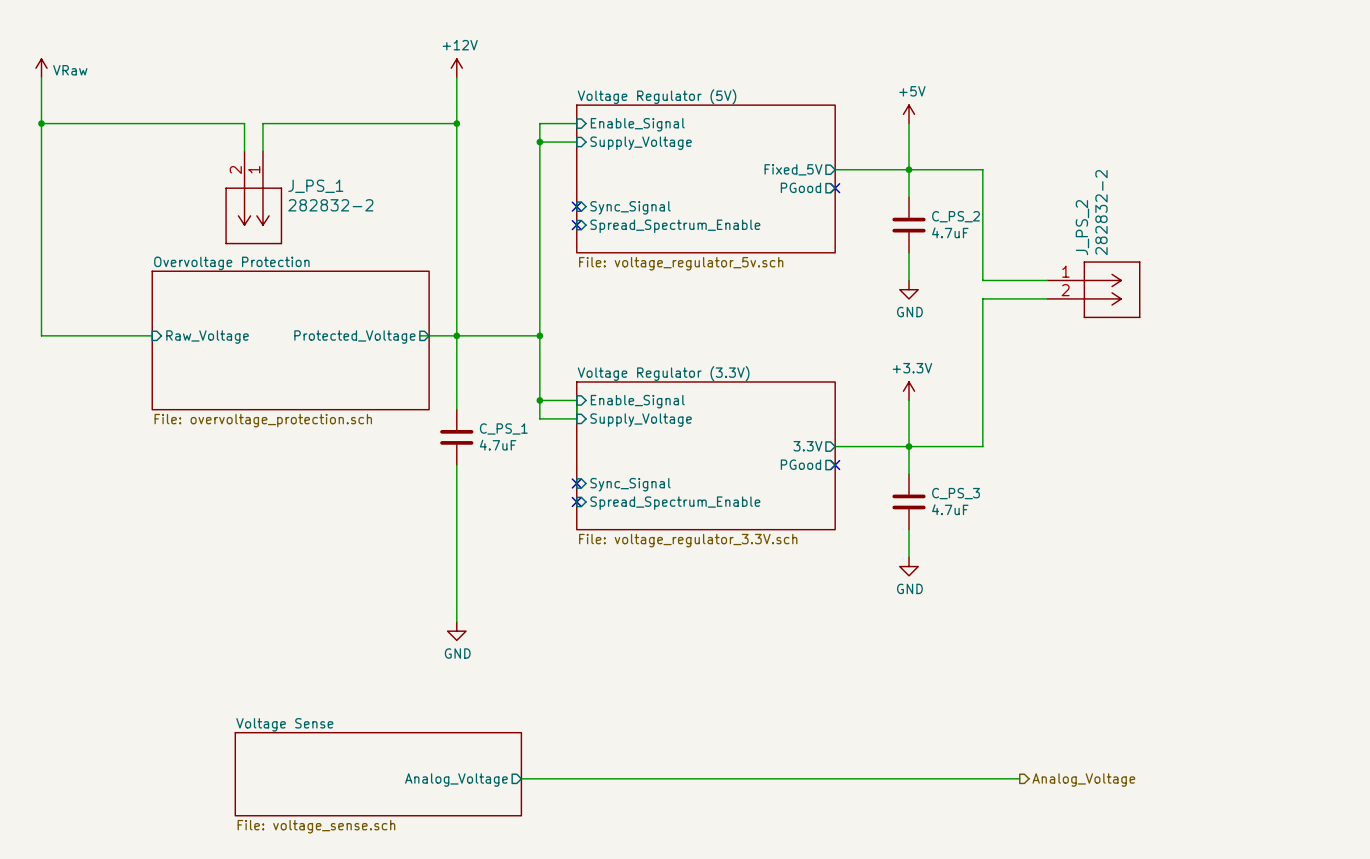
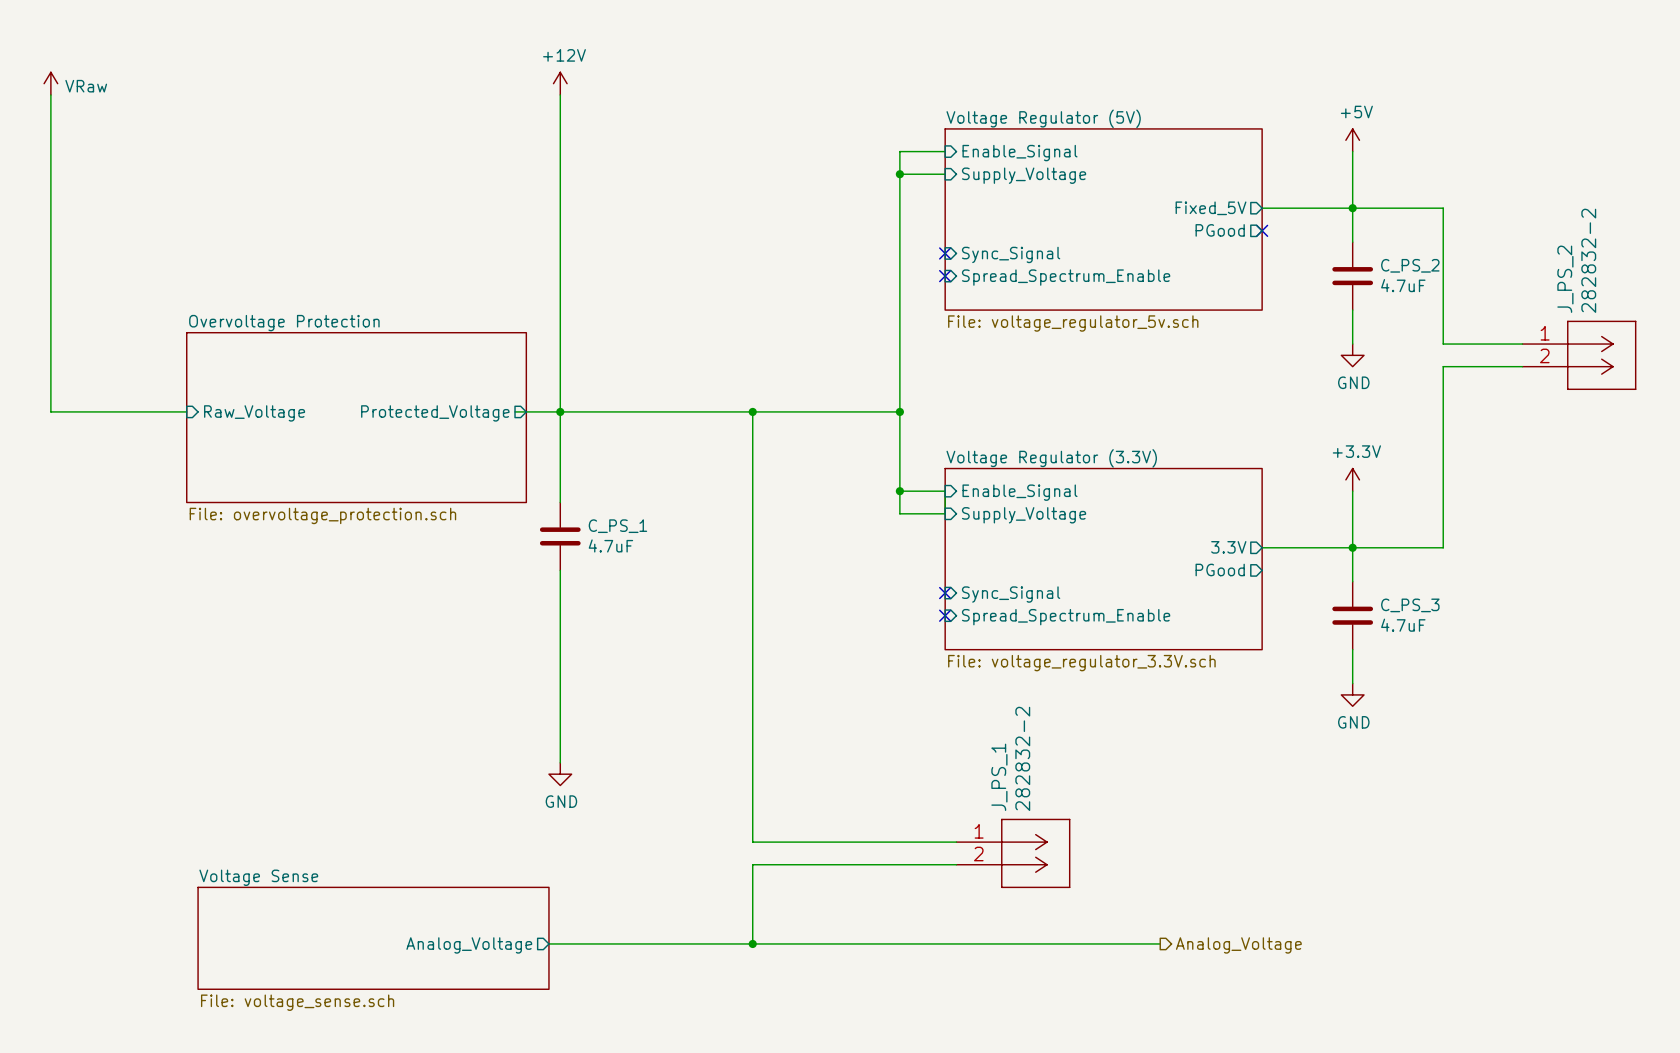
power symbol: +5V (909, 114) -> none
power symbol: none -> +5V (1352, 140)
wire: (41, 123) (244, 123) (244, 151) -> none
junction: (41, 123) -> none
wire: (456, 123) (262, 123) (262, 151) -> none
junction: (456, 123) -> none
wire: (576, 123) (539, 123) (539, 418) (576, 418) (576, 400) (539, 400) -> none
wire: none -> (945, 151) (899, 151) (899, 513) (945, 513) (945, 491) (899, 491)
wire: (909, 123) (909, 197) -> none
wire: none -> (1352, 151) (1352, 242)
sheet pin: Enable_Signal (637, 124) -> none
sheet pin: none -> Enable_Signal (1020, 153)
wire: (539, 142) (576, 142) -> none
junction: (539, 142) -> none
wire: none -> (899, 174) (945, 174)
junction: none -> (899, 174)
sheet pin: Supply_Voltage (641, 143) -> none
sheet pin: none -> Supply_Voltage (1024, 175)
sheet pin: Fixed_5V (793, 169) -> none
wire: (835, 169) (982, 169) (982, 280) (1047, 280) -> none
junction: (909, 169) -> none
sheet pin: none -> Fixed_5V (1211, 208)
wire: none -> (1262, 208) (1443, 208) (1443, 344) (1522, 344)
junction: none -> (1352, 208)
sheet Voltage Regulator (5V) position: (705, 178) -> (1103, 219)
sheet pin: PGood (800, 187) -> none
sheet pin: none -> PGood (1220, 230)
no-connect mark: (835, 188) -> none
no-connect mark: none -> (1262, 230)
J_PS_1 position: (253, 197) -> (1013, 853)
no-connect mark: (576, 206) -> none
no-connect mark: none -> (945, 253)
sheet pin: Sync_Signal (630, 207) -> none
sheet pin: none -> Sync_Signal (1011, 254)
J_PS_1 rotation: 0° (253, 215) -> 90° counterclockwise (1035, 853)
no-connect mark: (576, 225) -> none
no-connect mark: none -> (945, 276)
C_PS_2 position: (909, 225) -> (1352, 276)
sheet pin: Spread_Spectrum_Enable (675, 226) -> none
sheet pin: none -> Spread_Spectrum_Enable (1066, 277)
wire: (909, 252) (909, 280) -> none
wire: none -> (1352, 310) (1352, 344)
power symbol: GND (909, 289) -> none
J_PS_2 position: (1093, 289) -> (1579, 355)
power symbol: none -> GND (1352, 355)
wire: (1047, 298) (982, 298) (982, 446) (835, 446) -> none
wire: none -> (1522, 366) (1443, 366) (1443, 547) (1262, 547)
wire: none -> (662, 411) (899, 411)
junction: (539, 335) -> none
wire: none -> (752, 411) (752, 842) (956, 842)
junction: none -> (752, 411)
junction: none -> (899, 411)
power symbol: +3.3V (909, 391) -> none
power symbol: none -> +3.3V (1352, 479)
junction: (539, 400) -> none
junction: none -> (899, 491)
wire: (909, 400) (909, 474) -> none
wire: none -> (1352, 491) (1352, 581)
sheet pin: Enable_Signal (637, 401) -> none
sheet pin: none -> Enable_Signal (1020, 492)
sheet pin: Supply_Voltage (641, 420) -> none
sheet pin: none -> Supply_Voltage (1024, 515)
sheet pin: 3.3V (808, 446) -> none
junction: (909, 446) -> none
sheet pin: none -> 3.3V (1228, 547)
junction: none -> (1352, 547)
sheet Voltage Regulator (3.3V) position: (705, 455) -> (1103, 559)
sheet pin: PGood (800, 464) -> none
sheet pin: none -> PGood (1220, 570)
no-connect mark: (835, 465) -> none
no-connect mark: (576, 483) -> none
no-connect mark: none -> (945, 593)
sheet pin: Sync_Signal (630, 484) -> none
sheet pin: none -> Sync_Signal (1011, 594)
no-connect mark: (576, 501) -> none
no-connect mark: none -> (945, 615)
C_PS_3 position: (909, 501) -> (1352, 615)
sheet pin: Spread_Spectrum_Enable (675, 503) -> none
sheet pin: none -> Spread_Spectrum_Enable (1066, 617)
wire: (909, 529) (909, 557) -> none
wire: none -> (1352, 649) (1352, 683)
power symbol: GND (909, 566) -> none
power symbol: none -> GND (1352, 694)
wire: none -> (956, 864) (752, 864) (752, 943)
junction: none -> (752, 943)
sheet Voltage Sense position: (378, 774) -> (373, 938)
wire: (521, 778) (1019, 778) -> (548, 943) (1160, 943)
sheet pin position: Analog_Voltage (456, 780) -> Analog_Voltage (469, 945)
hierarchical label position: Analog_Voltage (1083, 780) -> Analog_Voltage (1238, 945)

